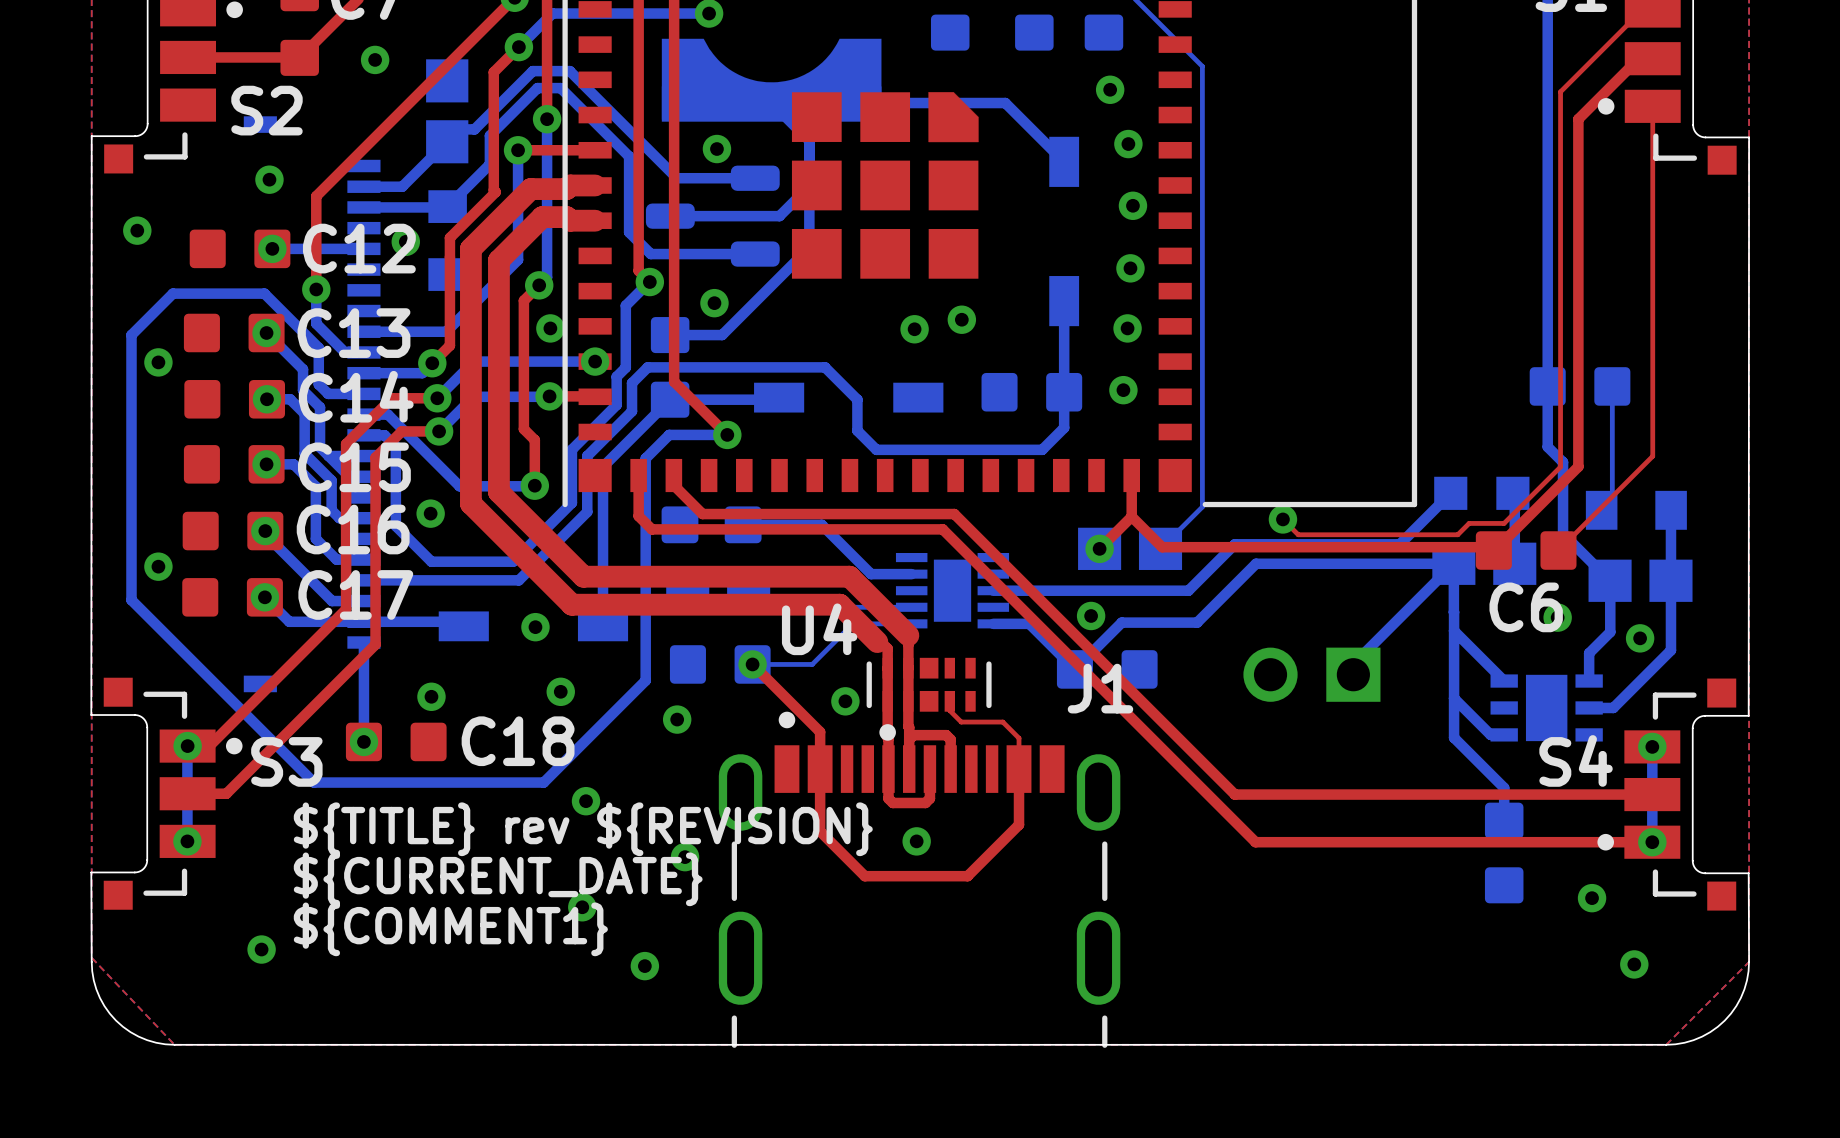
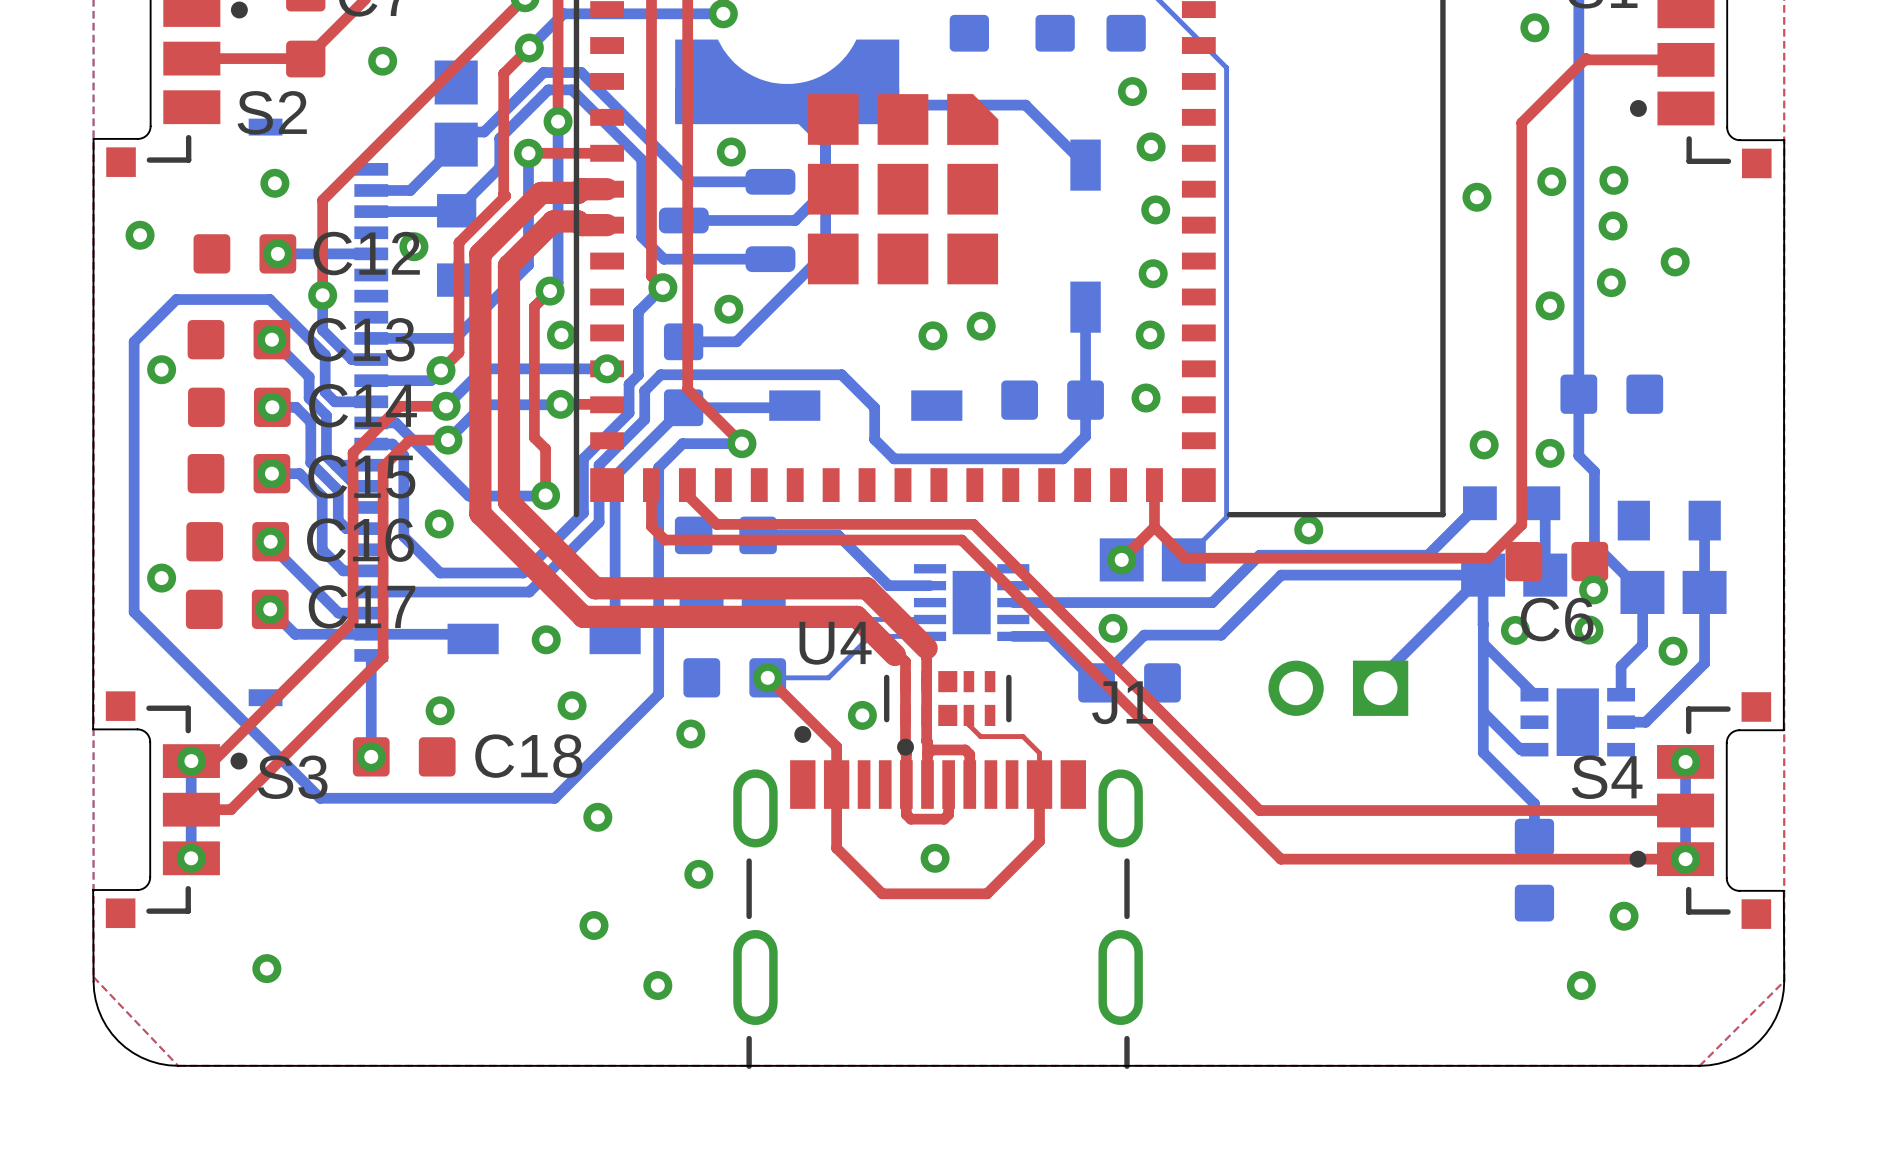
top track: (1652, 11) (1641, 11) (1560, 91) (1560, 466) (1504, 523) (1469, 523) (1457, 534) (1298, 534) (1282, 519) -> none
via: none -> (1534, 27)
top track: (1638, 58) (1578, 119) (1578, 466) (1497, 547) (1459, 547) -> (1671, 59) (1586, 58) (1521, 122) (1521, 524) (1488, 558)
top track: (1652, 106) (1652, 456) (1558, 550) -> none
via: none -> (1613, 180)
via: none -> (1551, 181)
via: none -> (1476, 197)
via: none -> (1613, 225)
via: none -> (1675, 261)
via: none -> (1611, 282)
via: none -> (1550, 305)
bottom track: (1612, 386) (1612, 499) (1601, 510) -> none
via: none -> (1484, 444)
via: none -> (1550, 453)
via: none -> (1593, 589)
via: none -> (1515, 630)
text: ${TITLE} rev ${REVISION} (583, 829) -> none
text: ${CURRENT_DATE} (498, 879) -> none
text: ${COMMENT1} (450, 929) -> none
via position: (1634, 964) -> (1581, 985)

